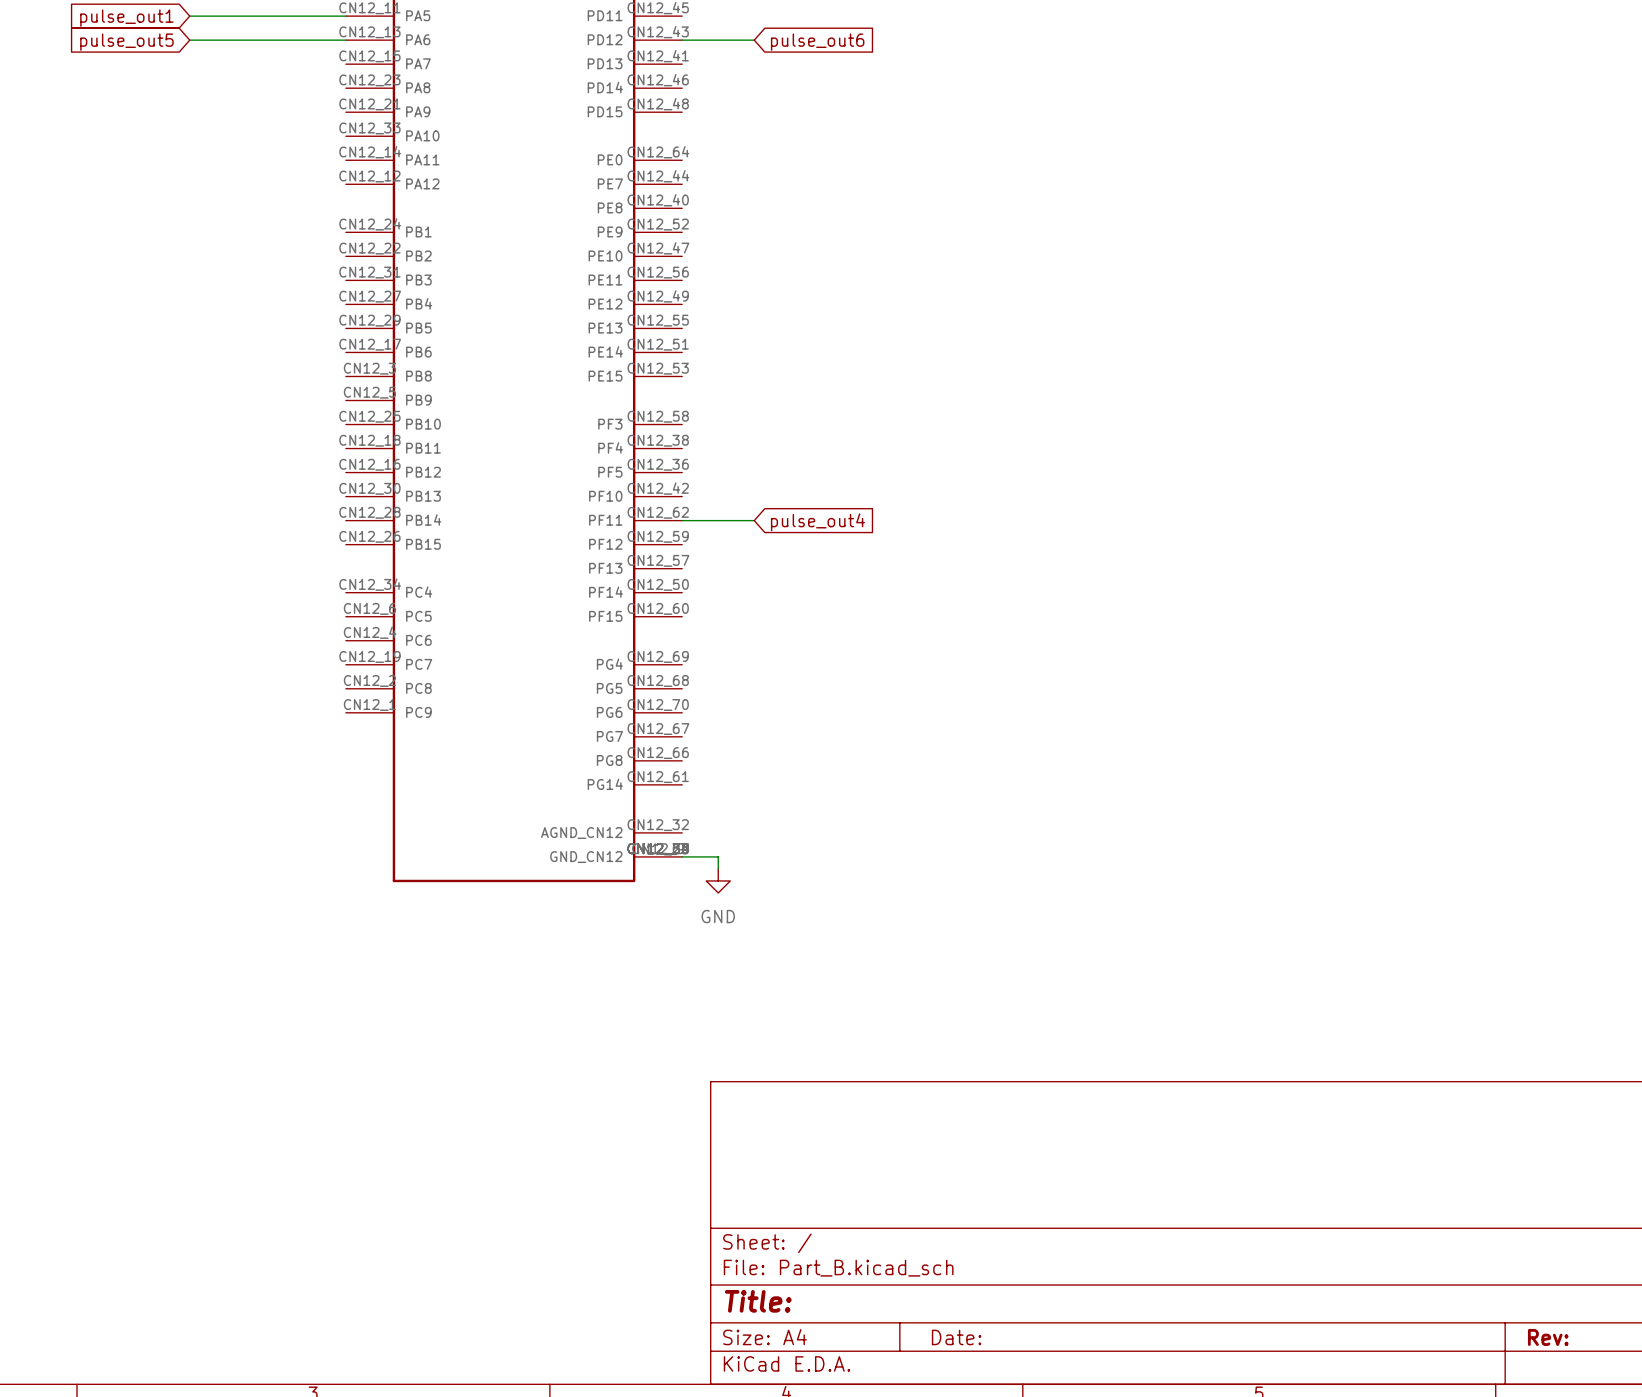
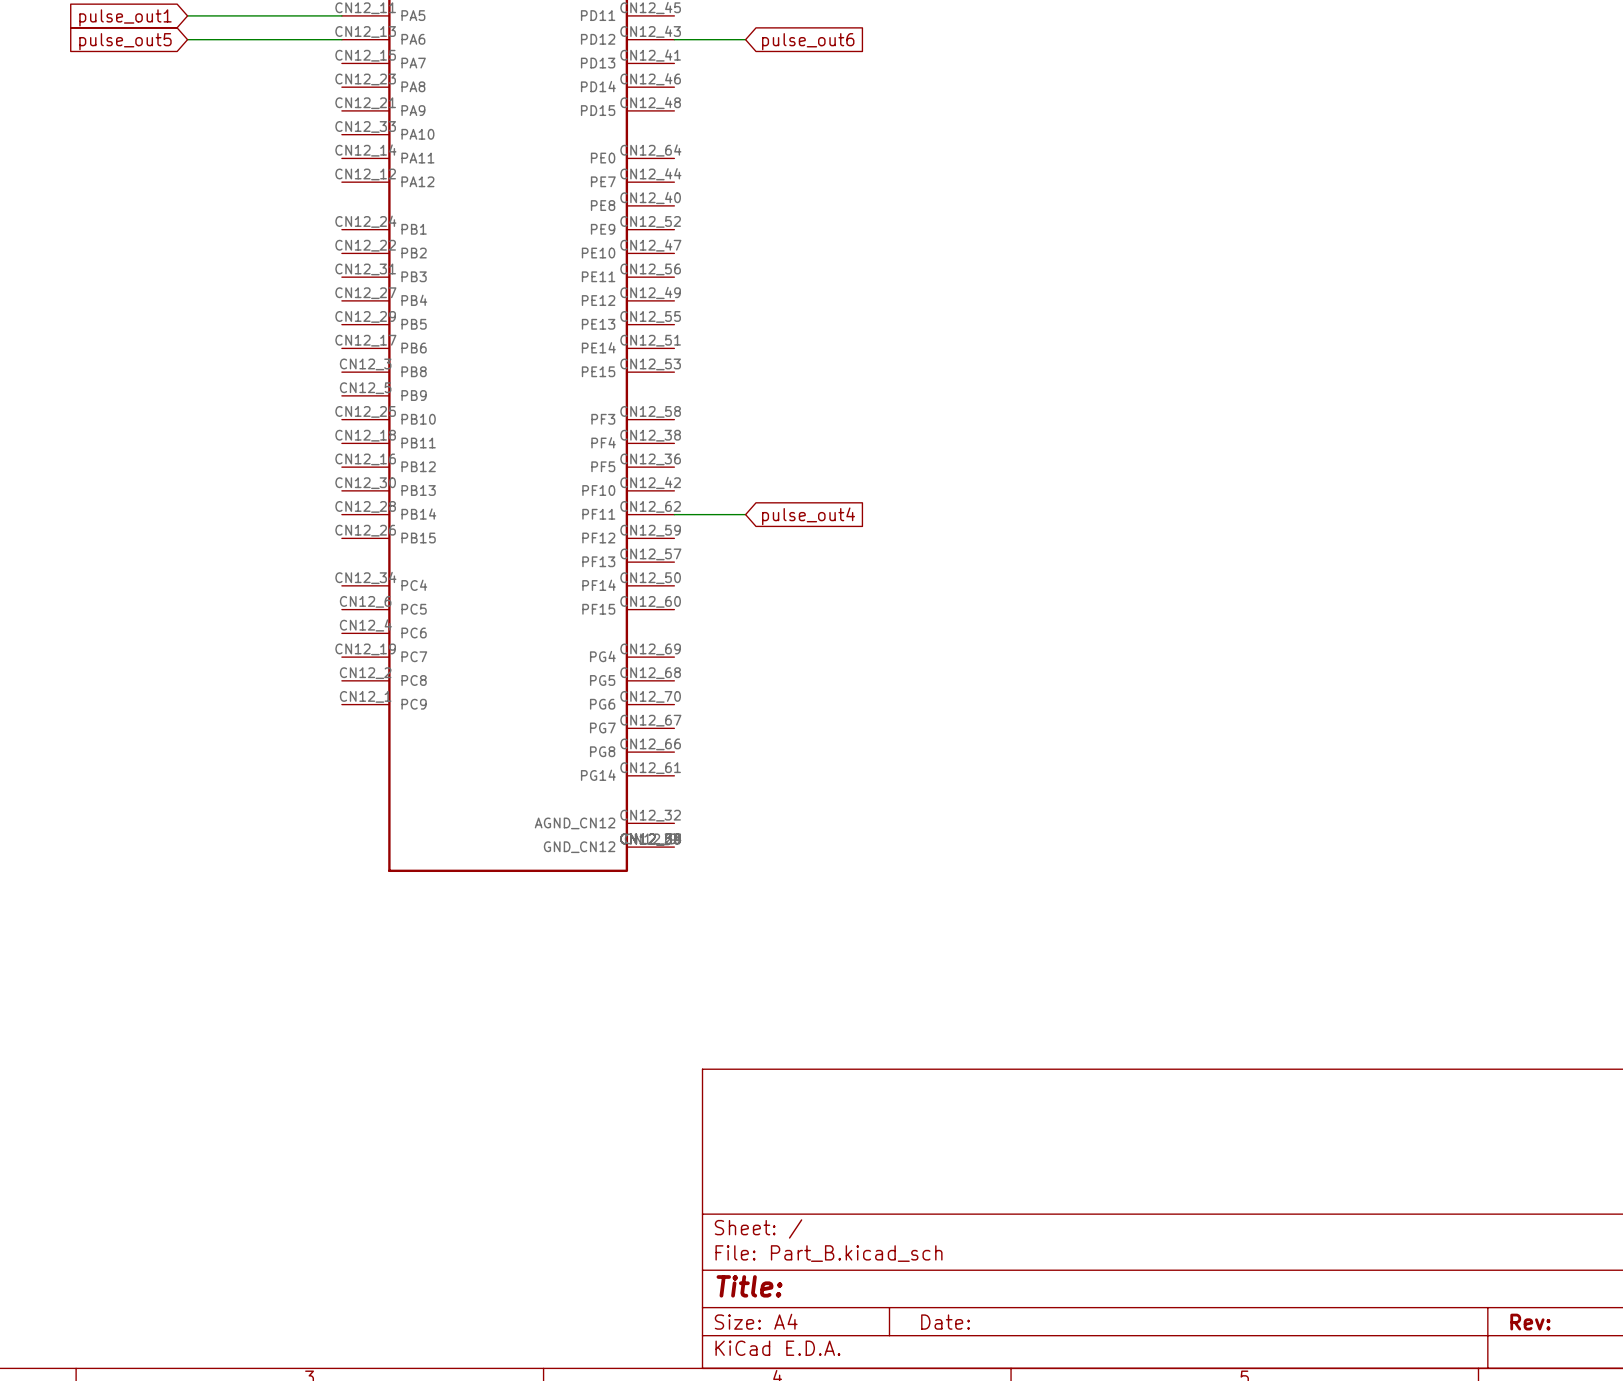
wire: (682, 856) (718, 856) (718, 868) -> none
power symbol: GND (718, 880) -> none

